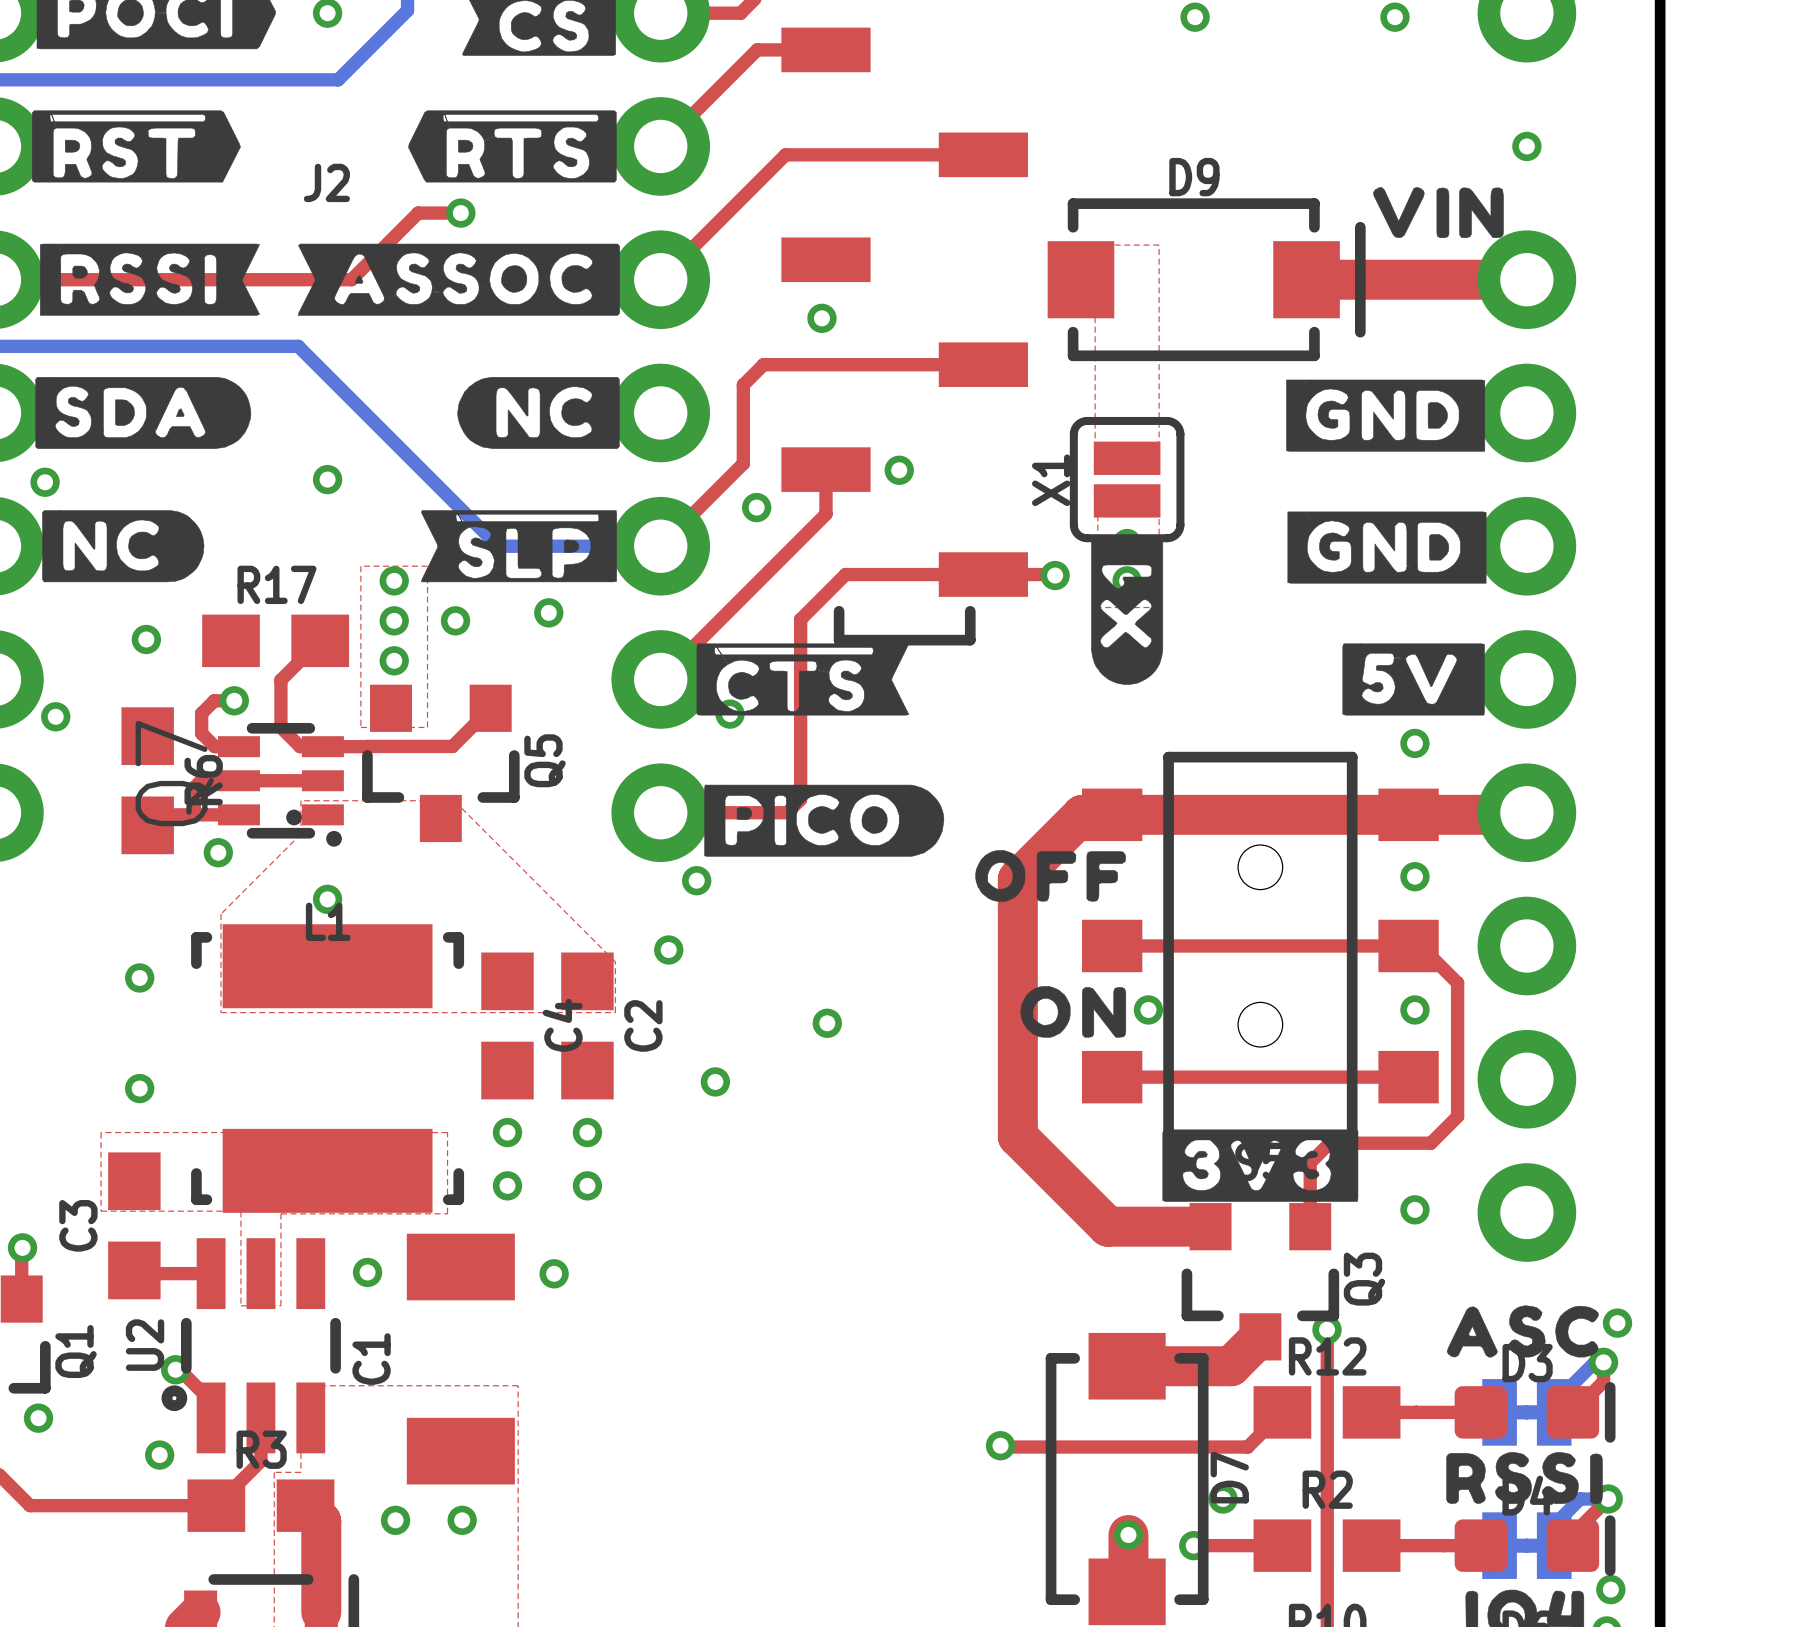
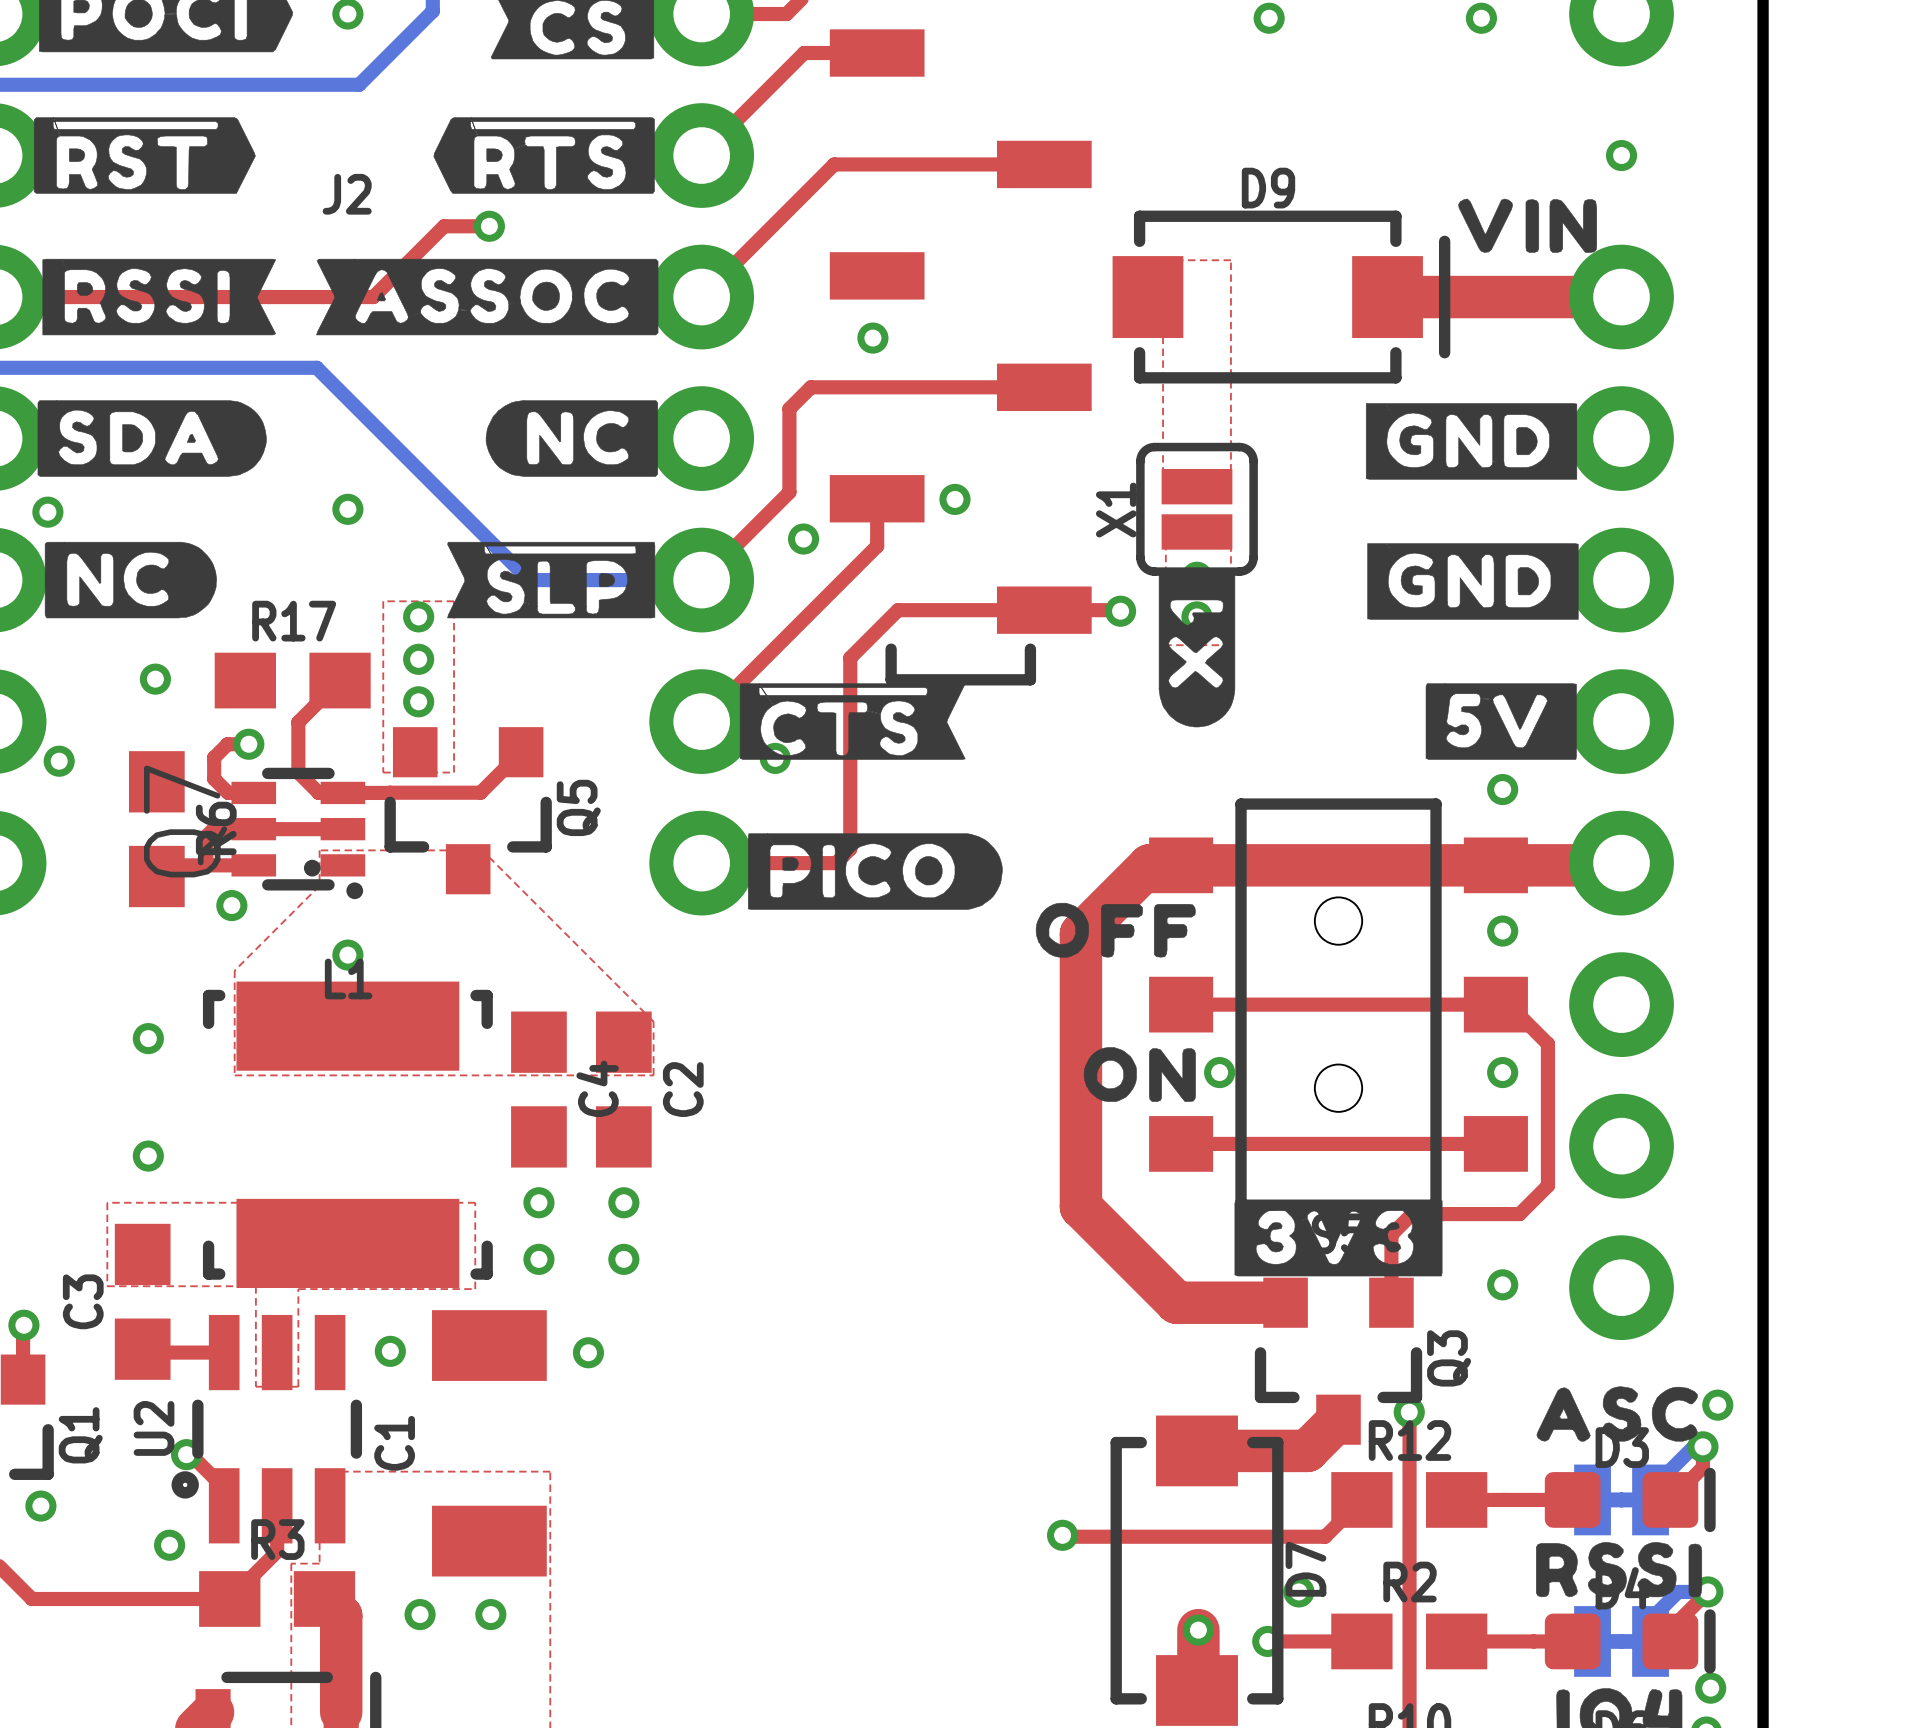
via: (548, 612) -> none
via: (455, 620) -> none
via: (696, 880) -> none
via: (668, 949) -> none
via: (827, 1023) -> none
via: (715, 1081) -> none

